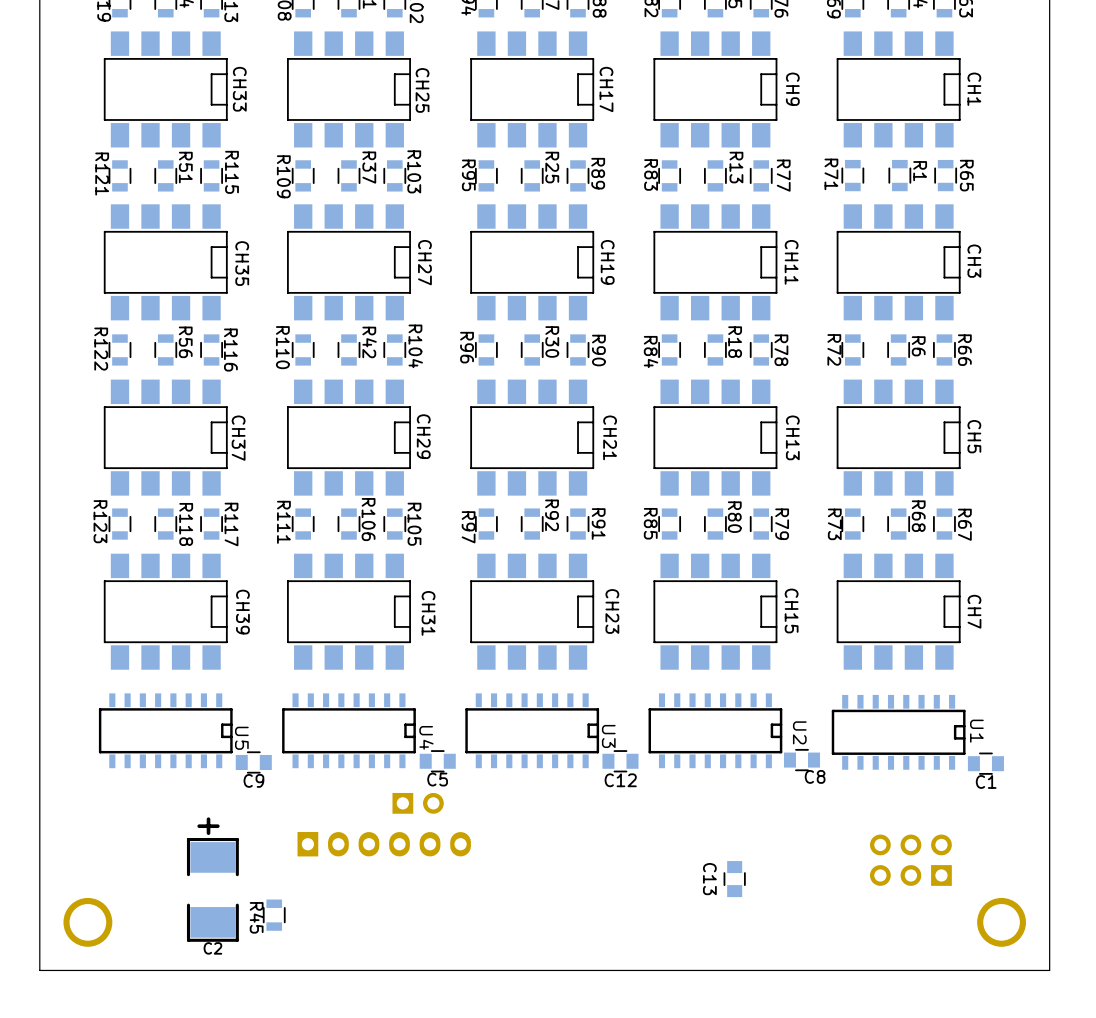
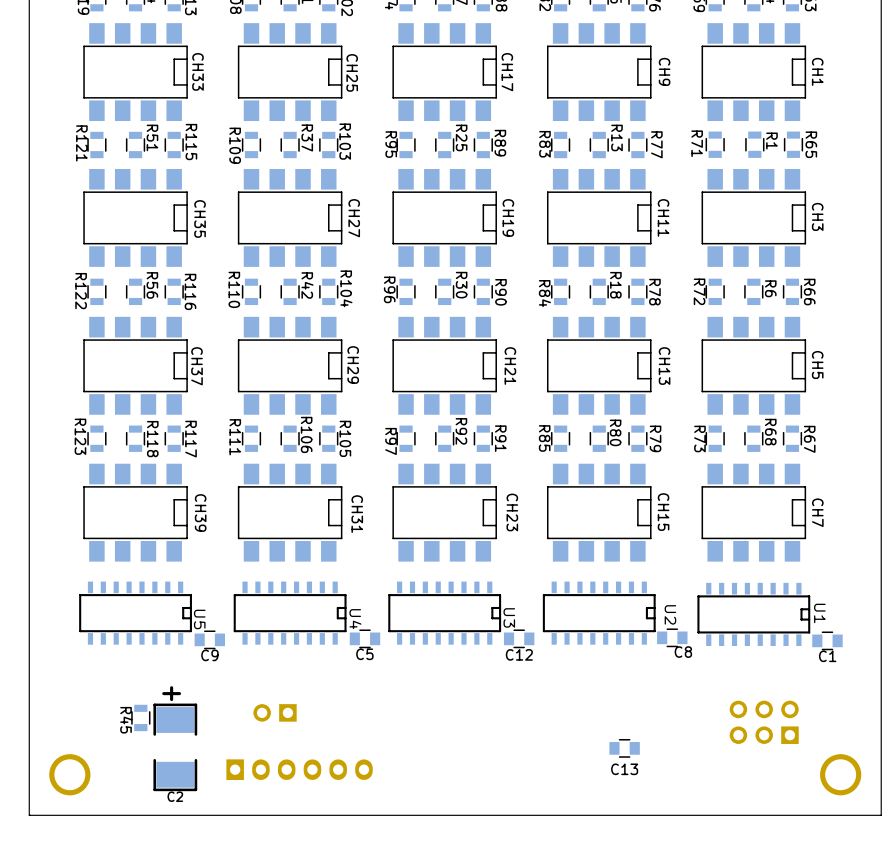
part rotation: 0° (418, 803) -> 180° (275, 712)
part position: (418, 803) -> (275, 712)
part position: (384, 844) -> (299, 769)
C13 name position: C13 (709, 879) -> C13 (624, 769)
C13 rotation: 0° (734, 879) -> 90° clockwise (624, 748)
R45 position: (274, 915) -> (140, 717)

